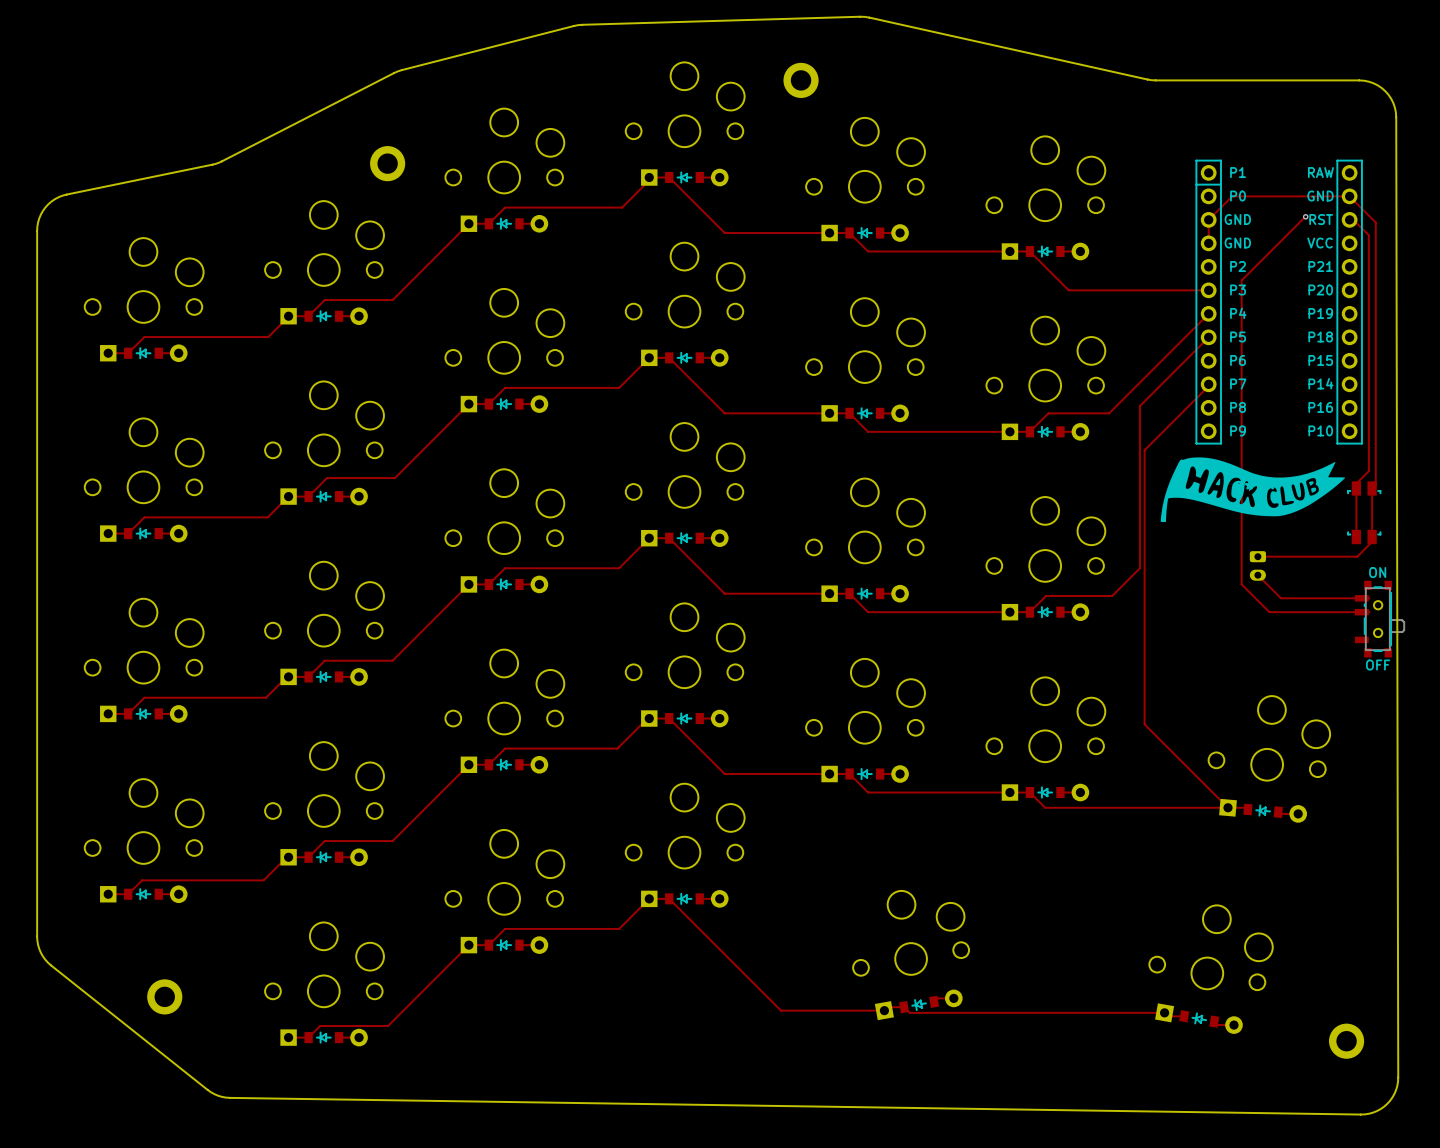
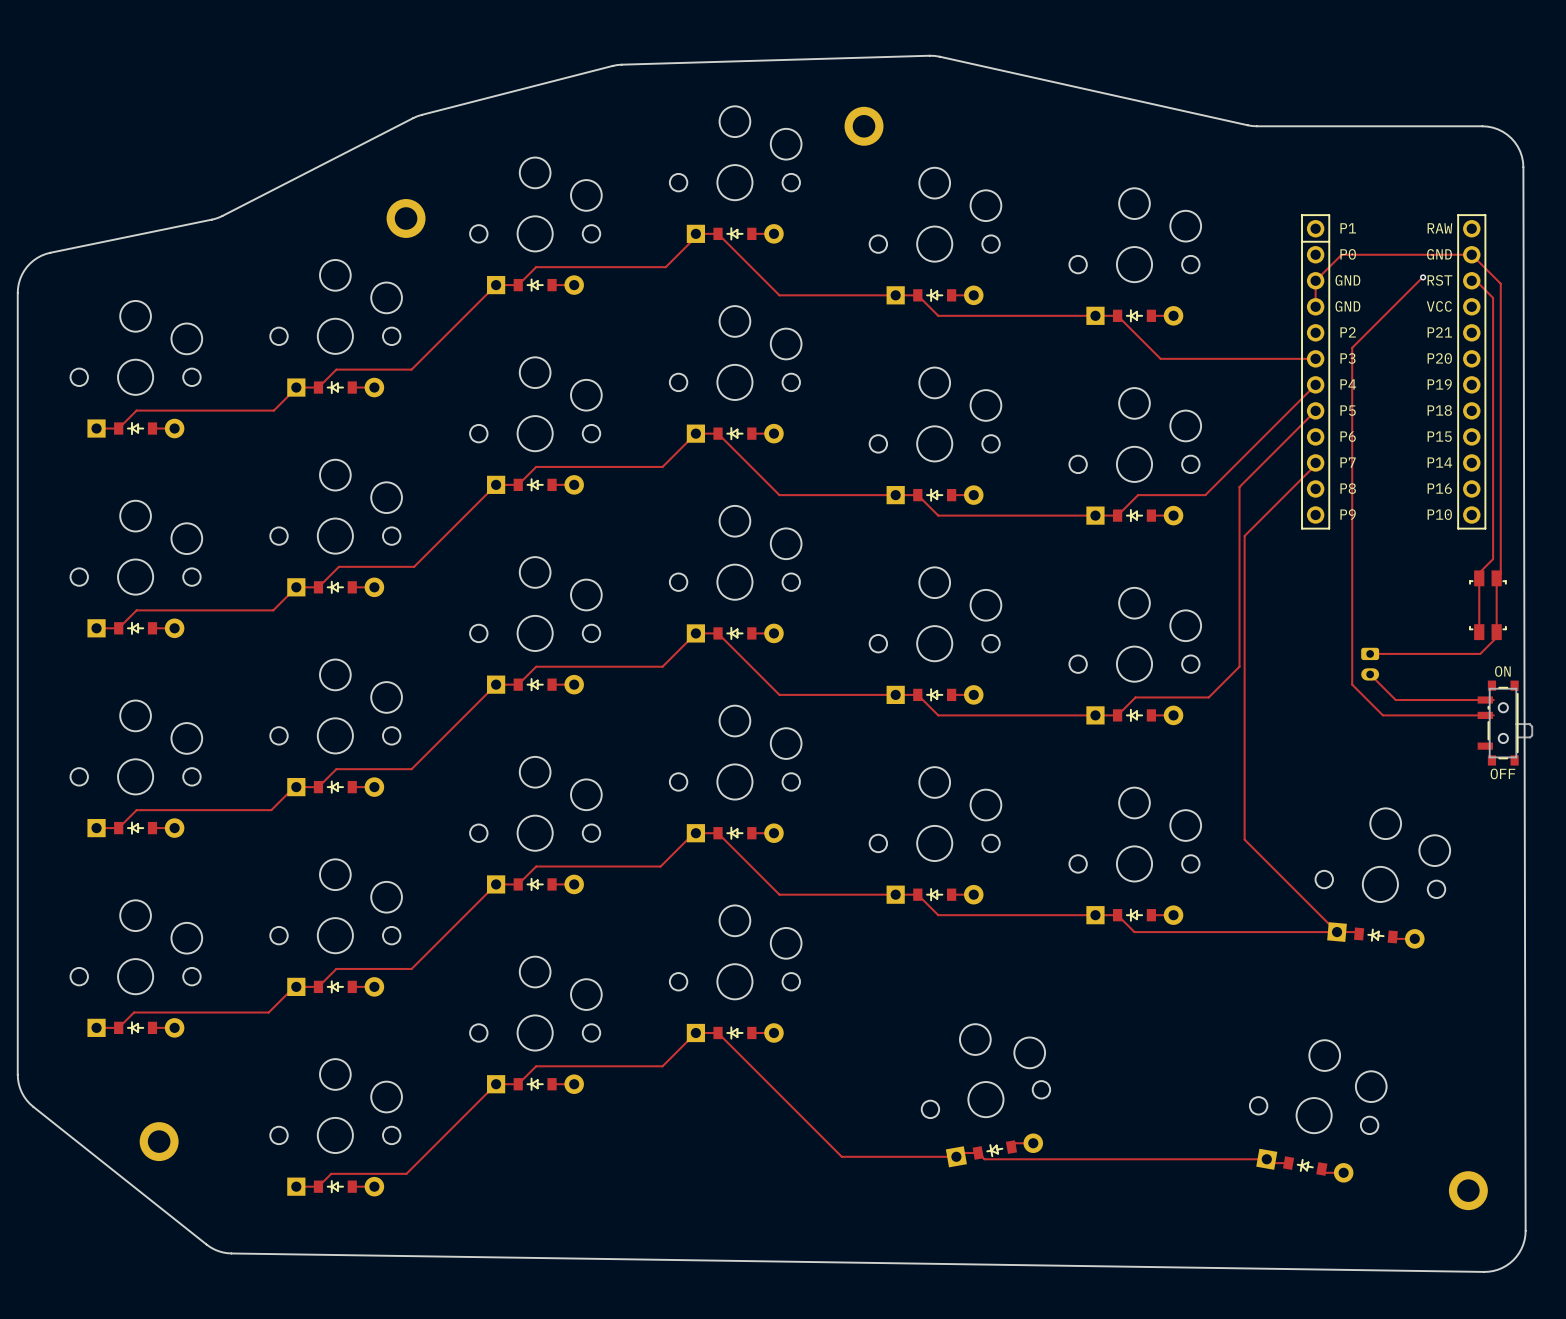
part: (1252, 489) -> none

